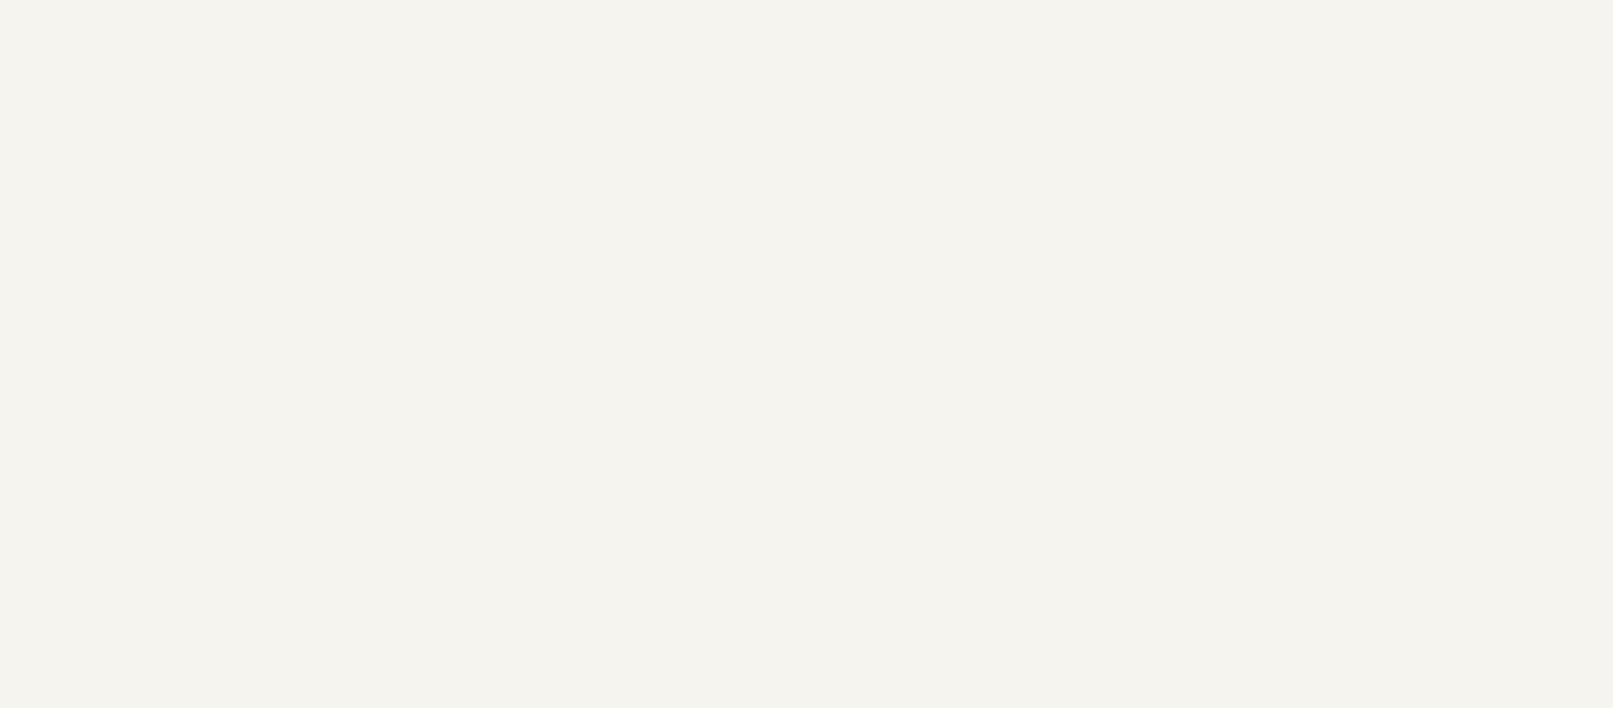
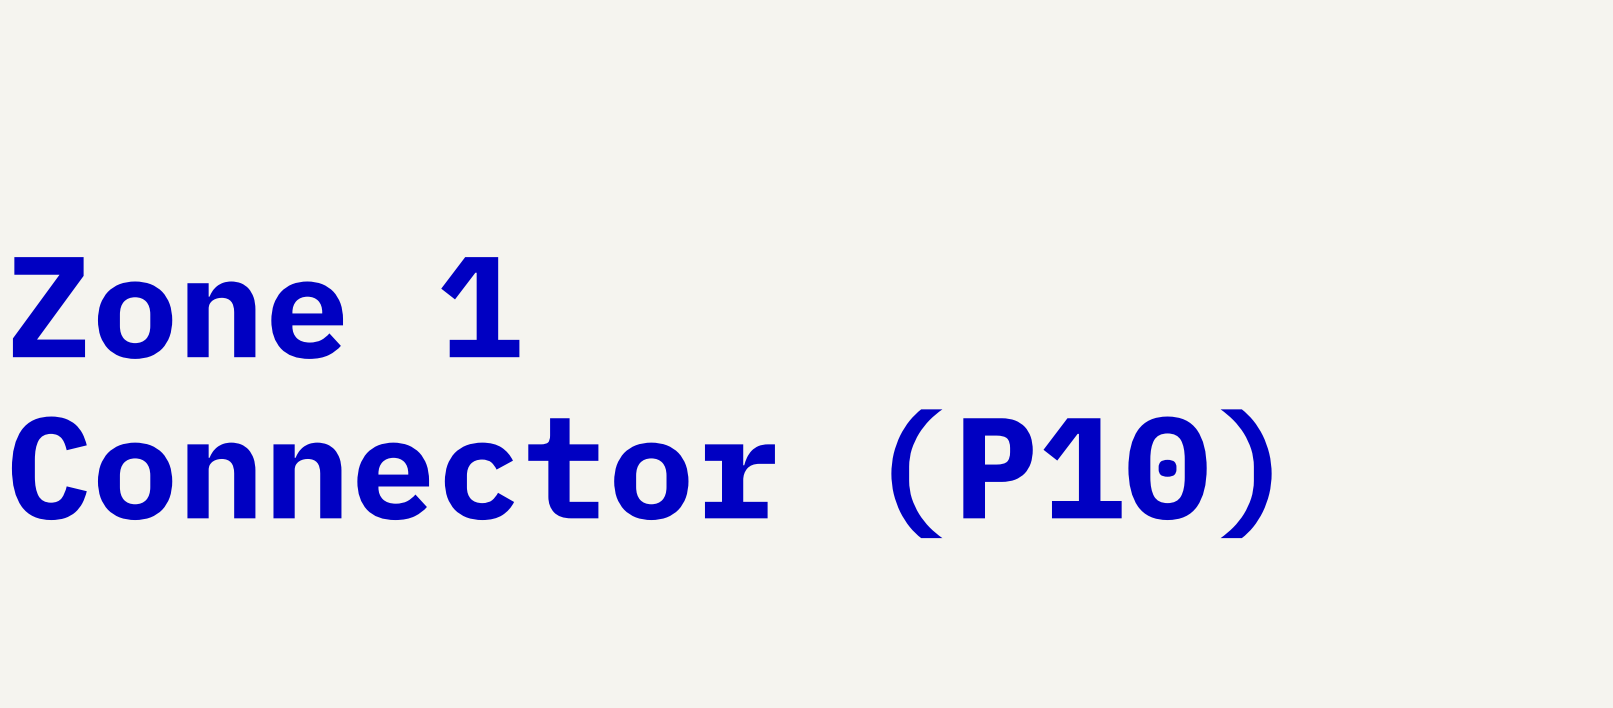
text: none -> Zone 1 (266, 308)
text: none -> Connector (P10) (641, 473)

